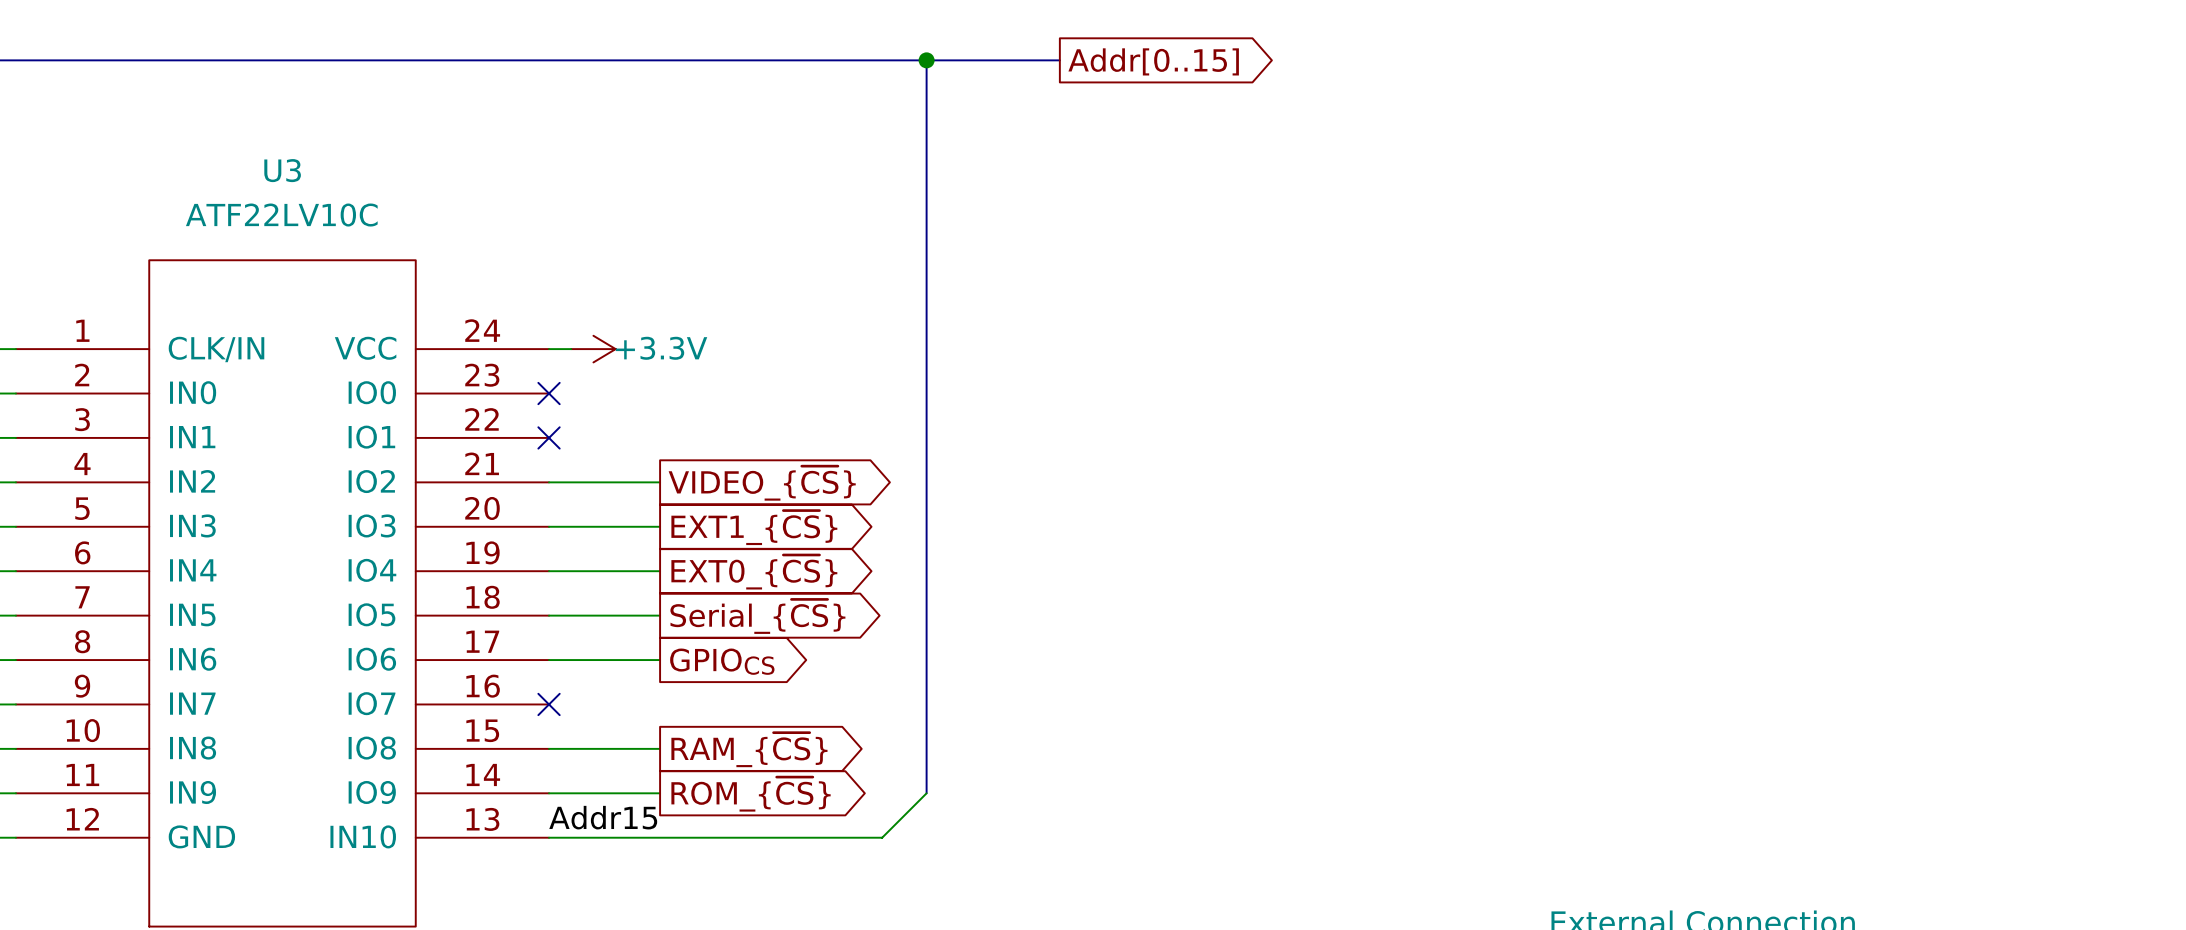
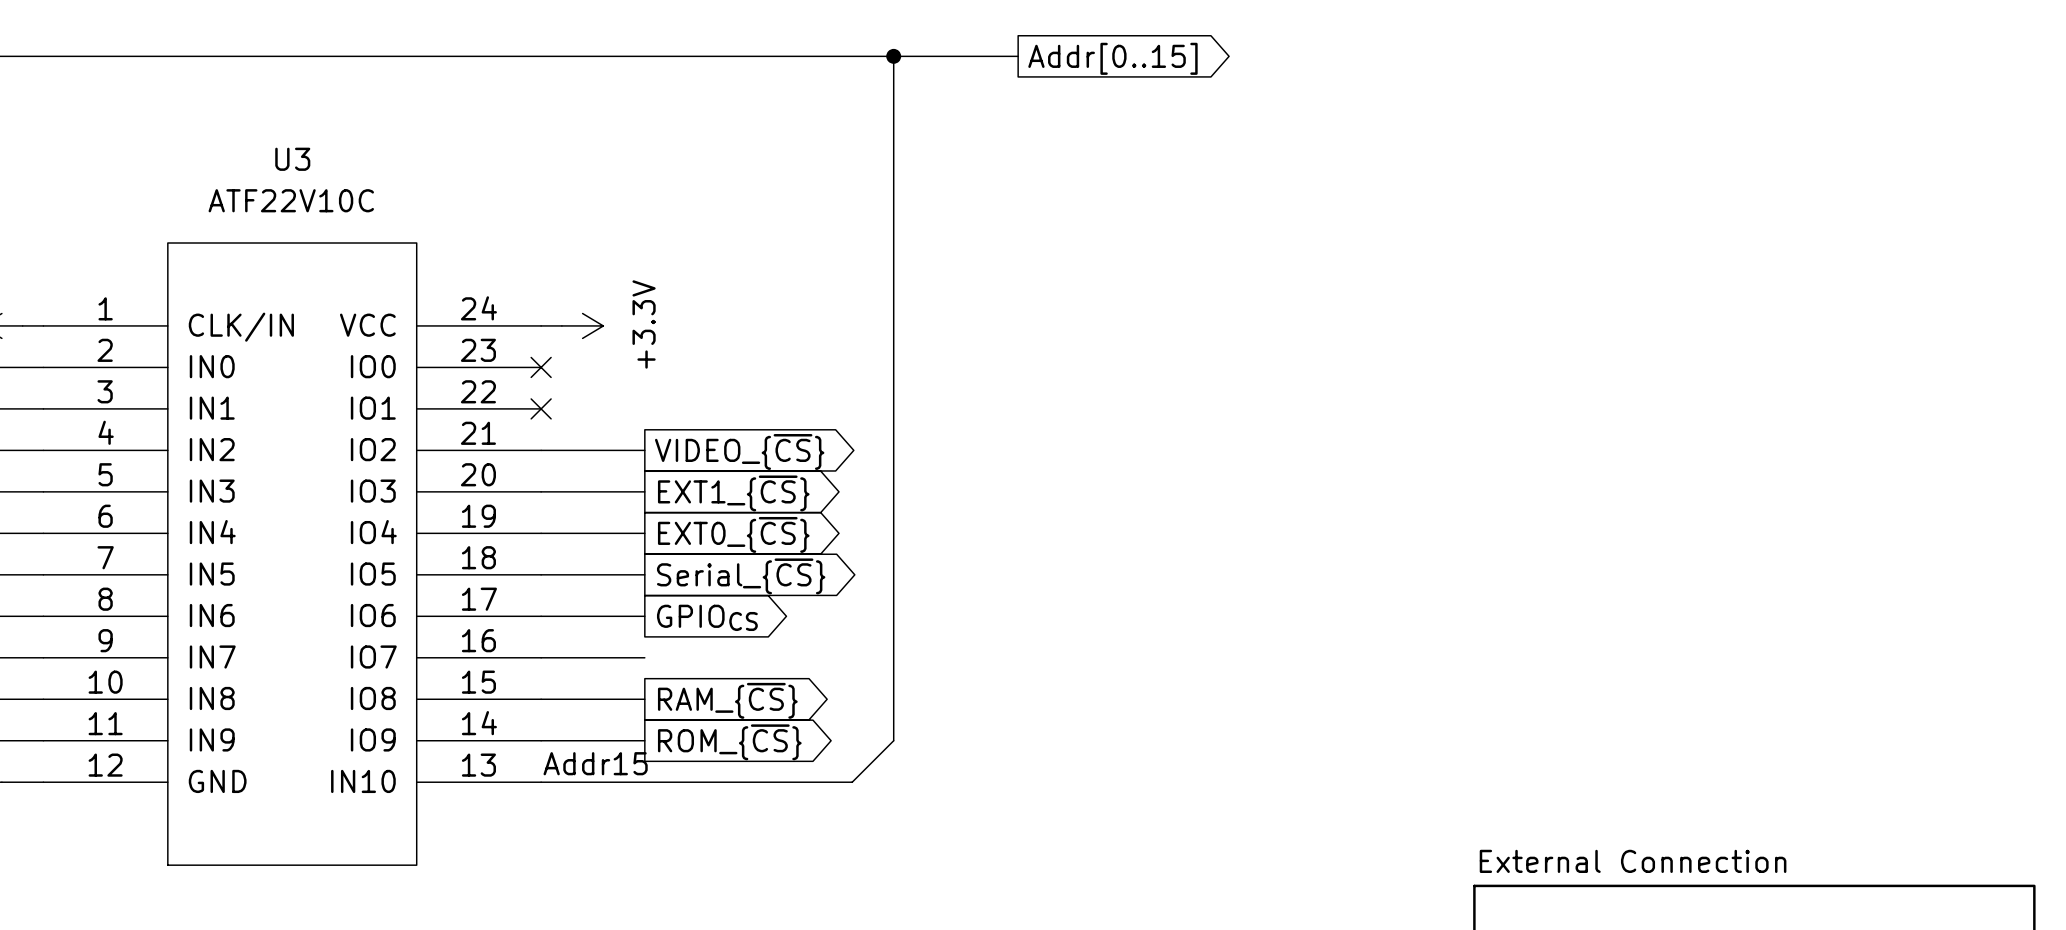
U3 value: ATF22LV10C (281, 215) -> ATF22V10C (291, 200)
power symbol text rotation: 0° (661, 348) -> 90° counterclockwise (644, 324)
wire: none -> (541, 657) (644, 657)
no-connect mark: (549, 704) -> none

